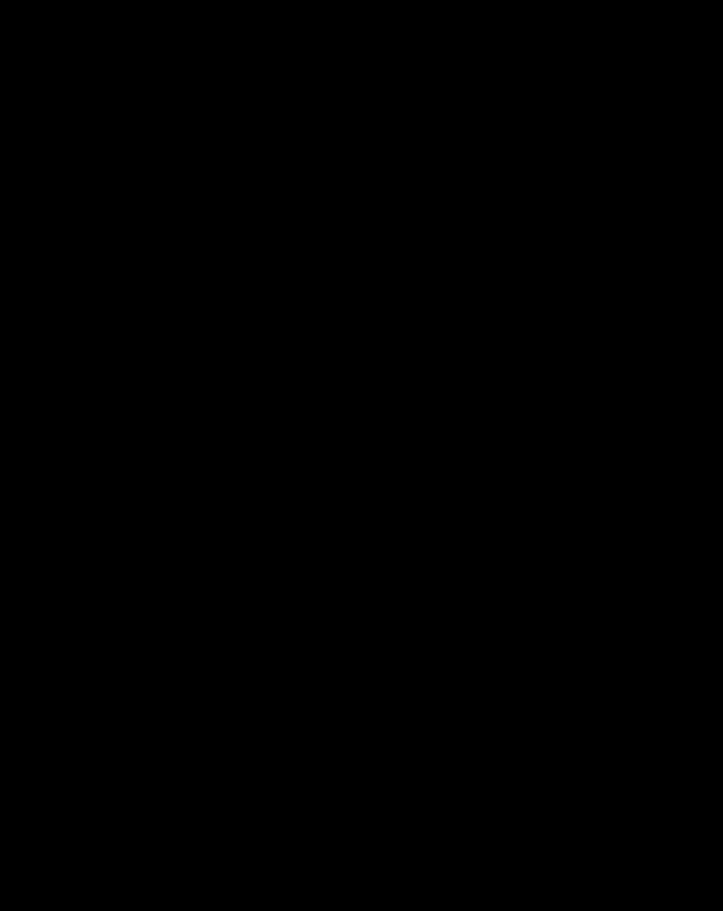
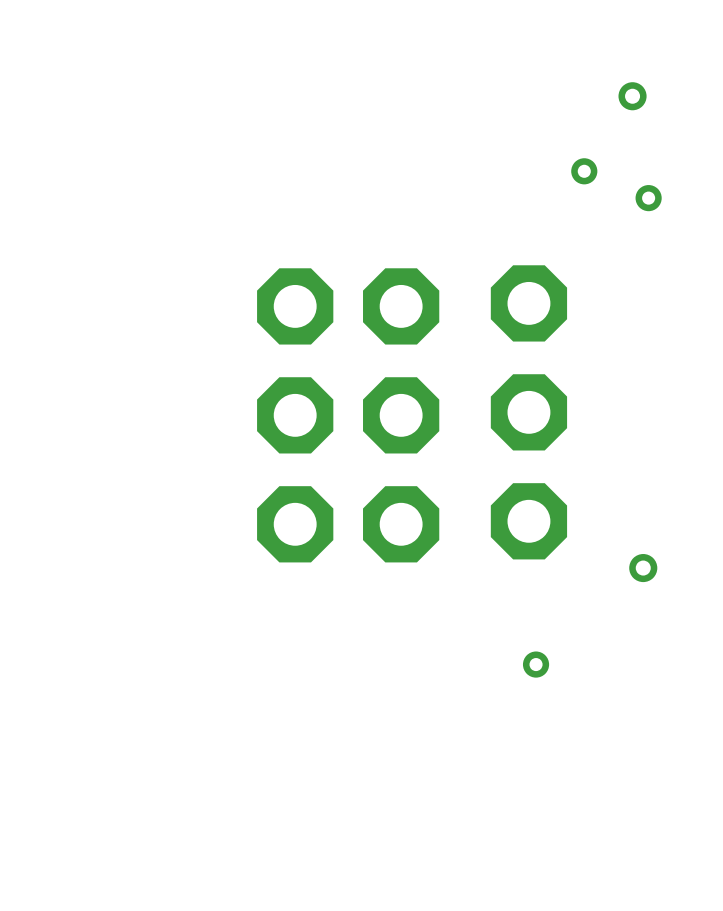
via: none -> (632, 96)
via: none -> (584, 171)
via: none -> (648, 198)
part: none -> (528, 412)
part: none -> (295, 415)
part: none -> (401, 415)
via: none -> (643, 568)
via: none -> (536, 664)

